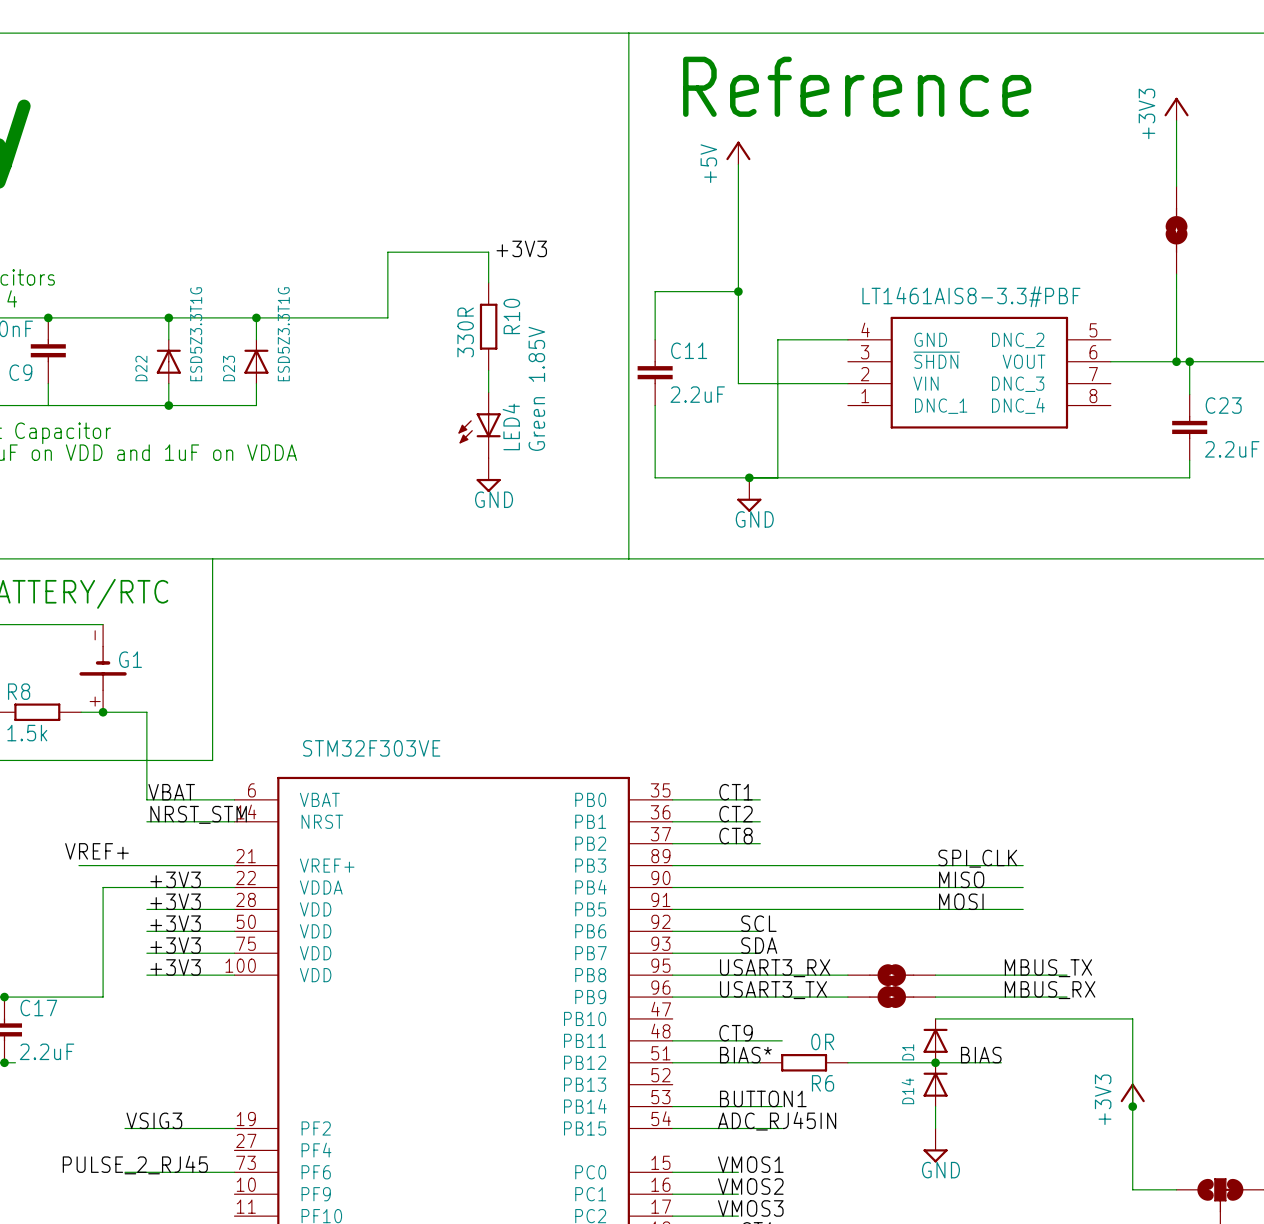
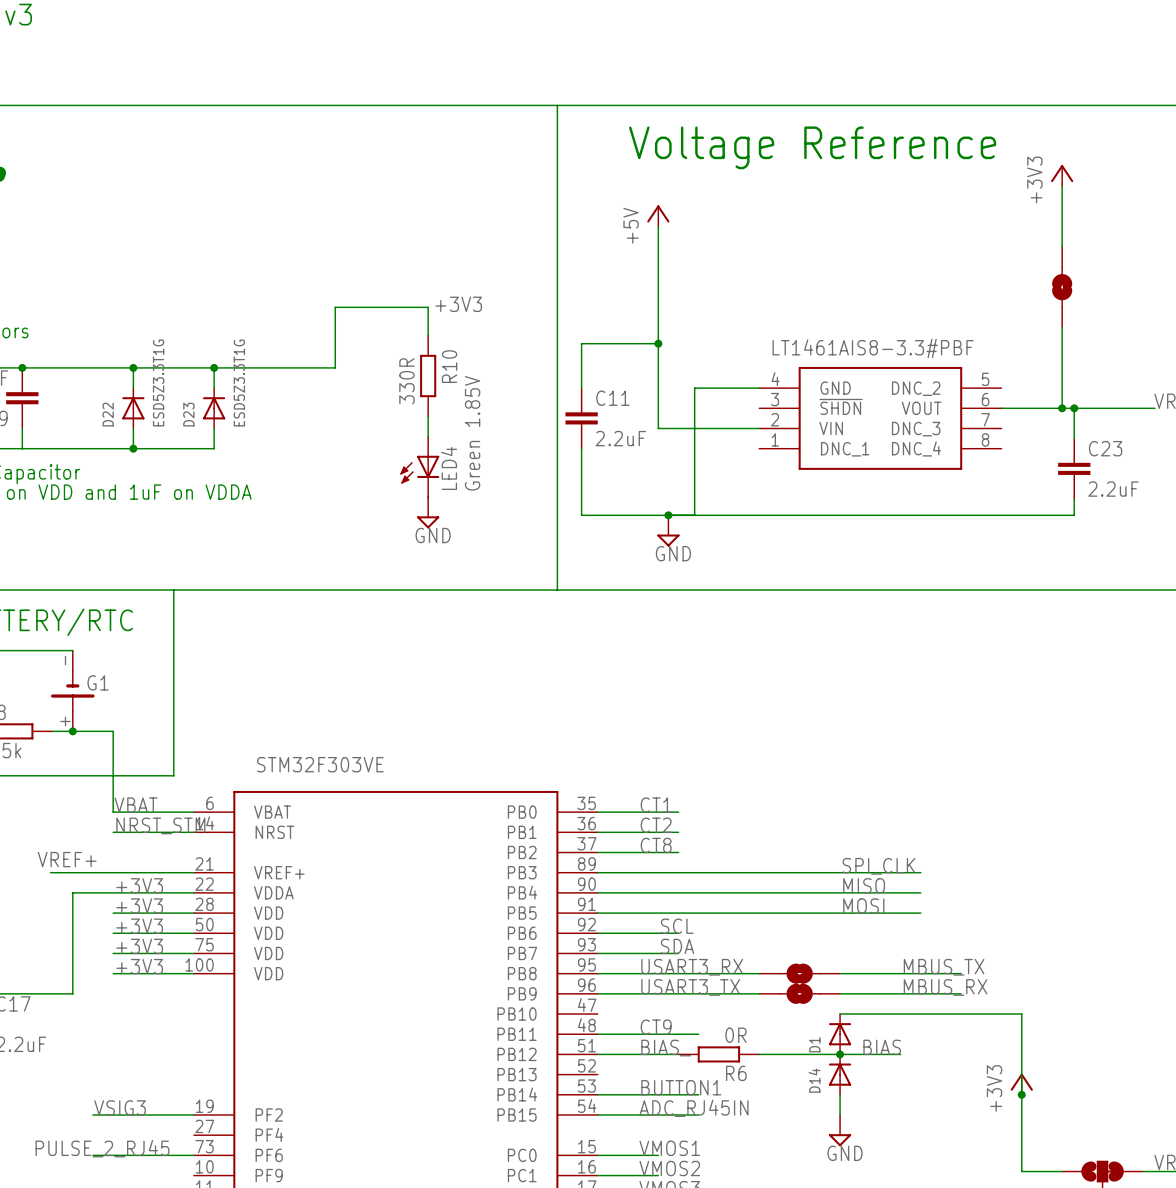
text: Reference (857, 86) -> Voltage Reference (812, 147)
label: BIAS* (745, 1055) -> BIAS_ (666, 1048)

